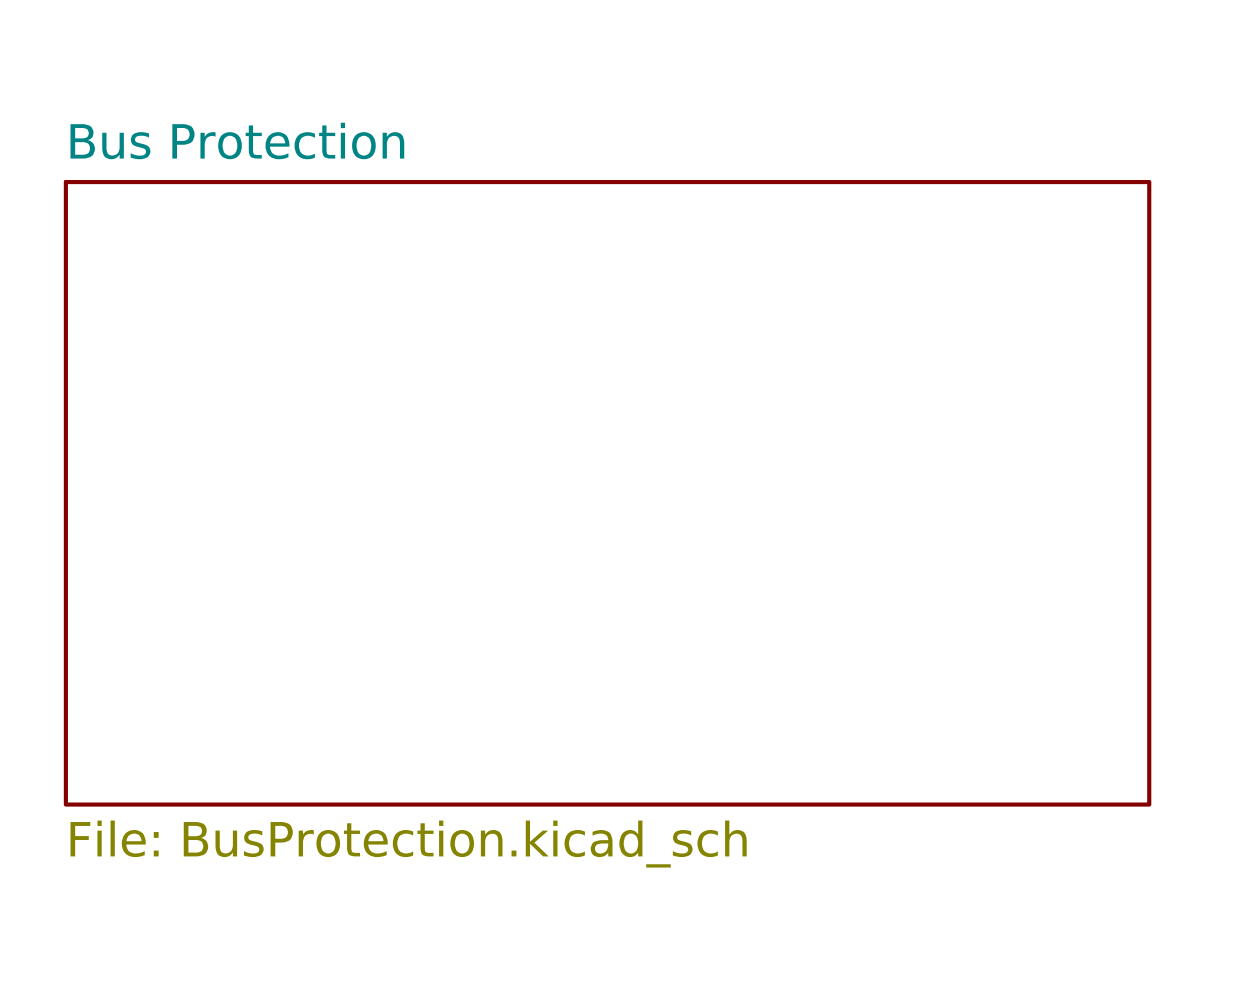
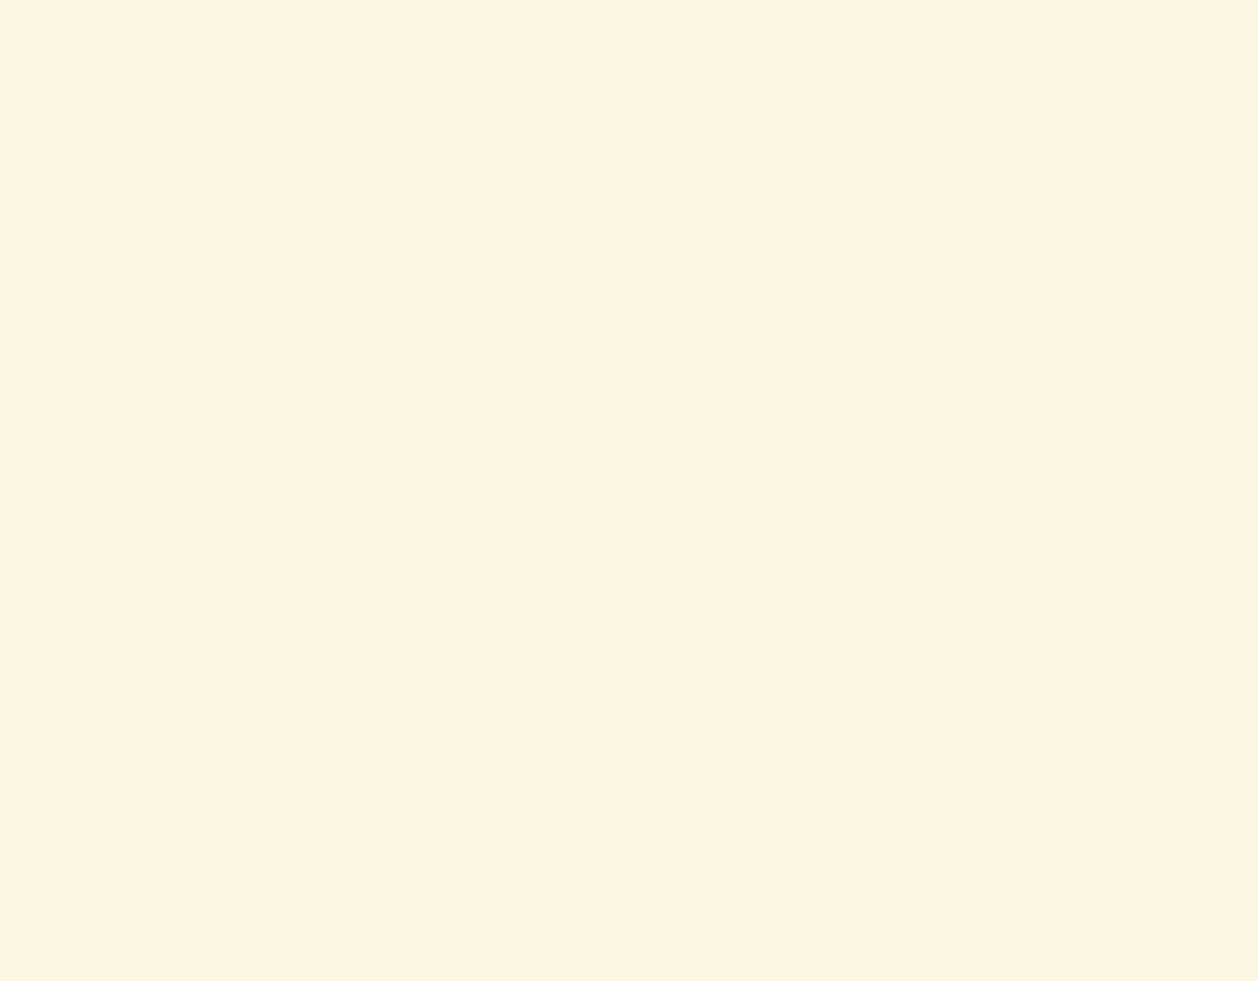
sheet Bus Protection: File: BusProtection.kicad_sch (607, 493) -> none

